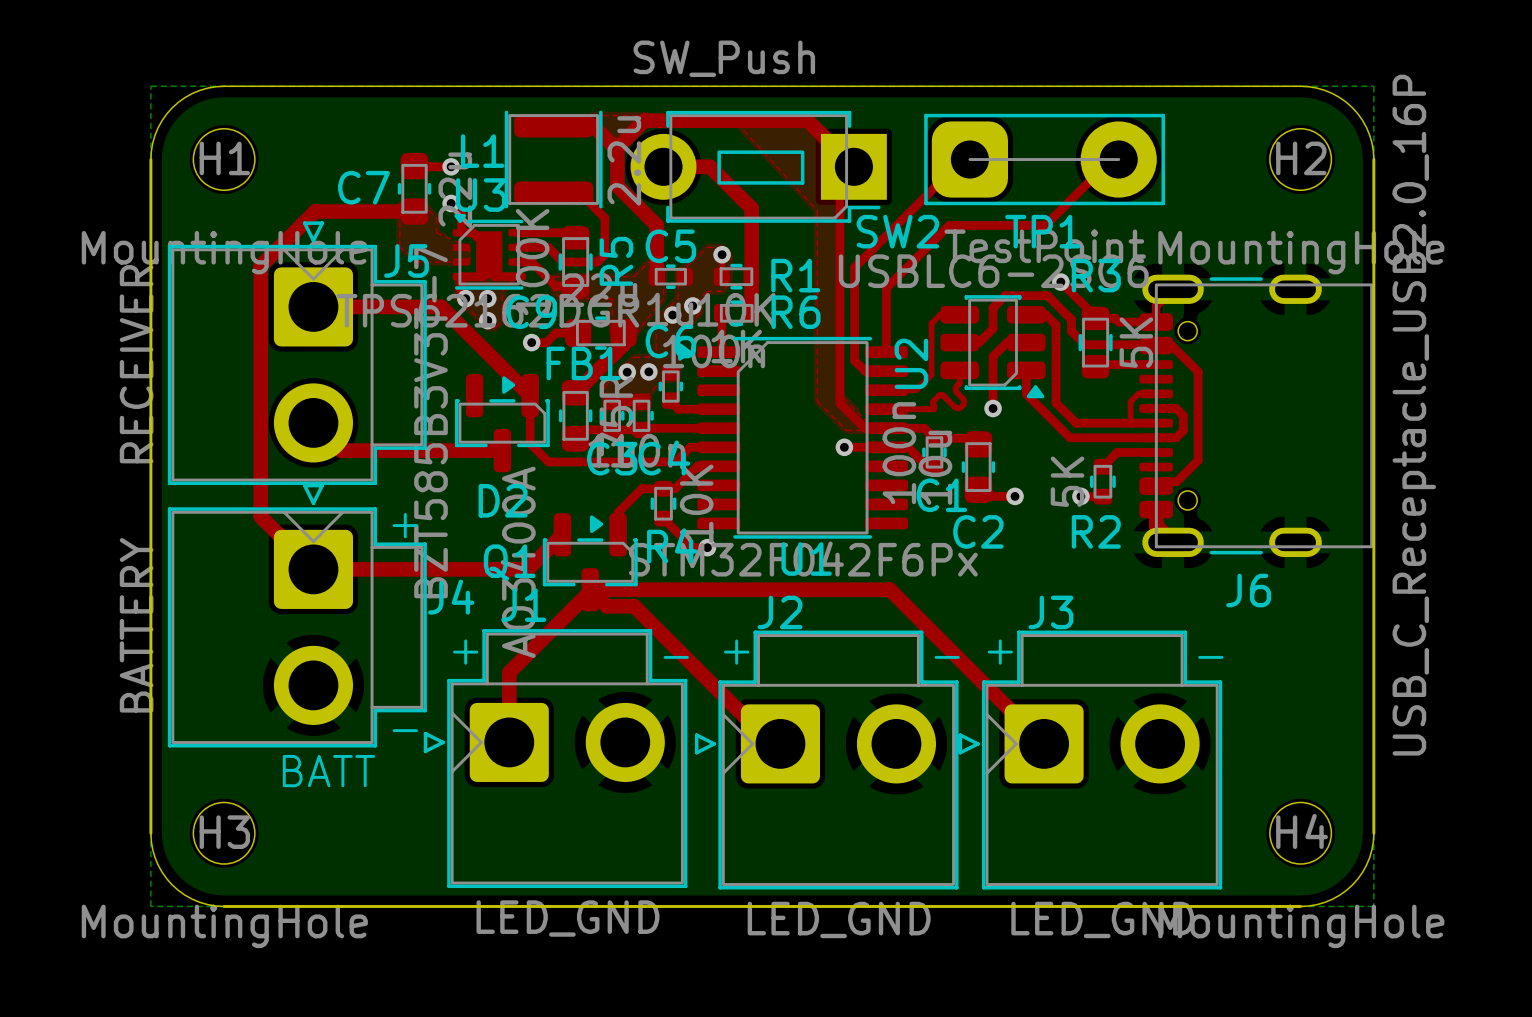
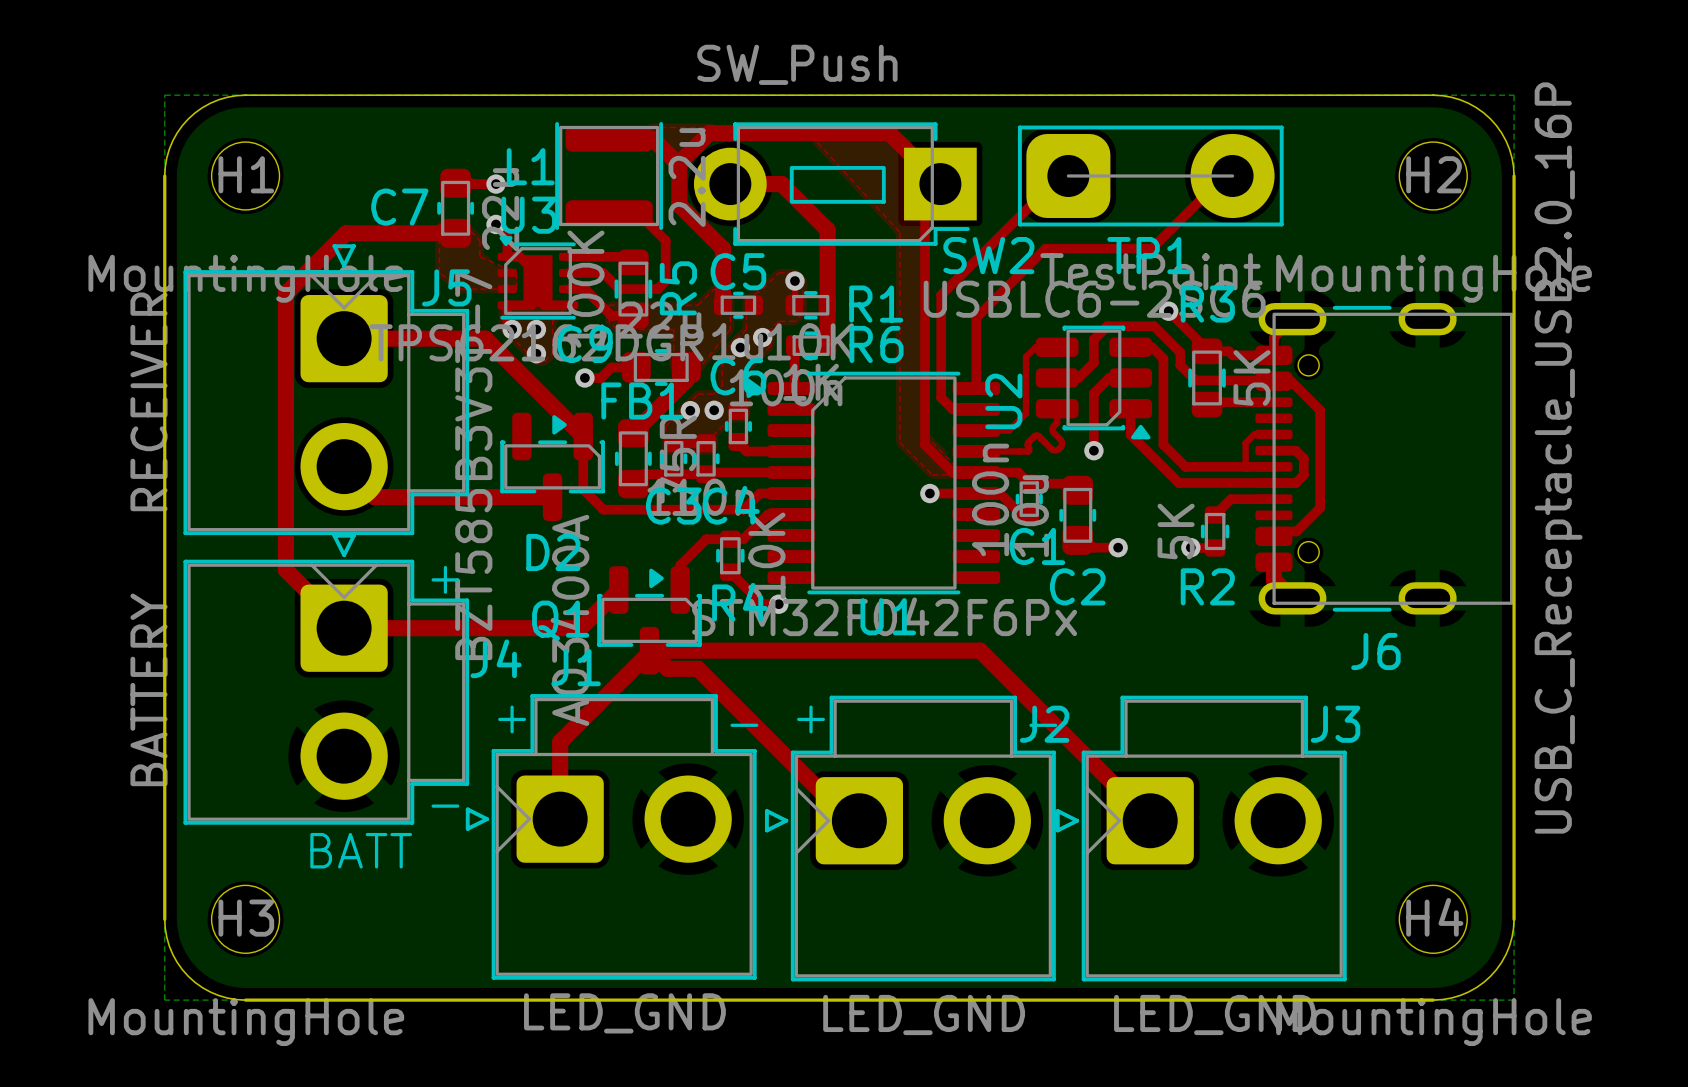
J2 name position: J2 (779, 612) -> J2 (1044, 724)
J3 name position: J3 (1050, 612) -> J3 (1335, 724)
text: + (1000, 652) -> none
text: - (1210, 657) -> none

